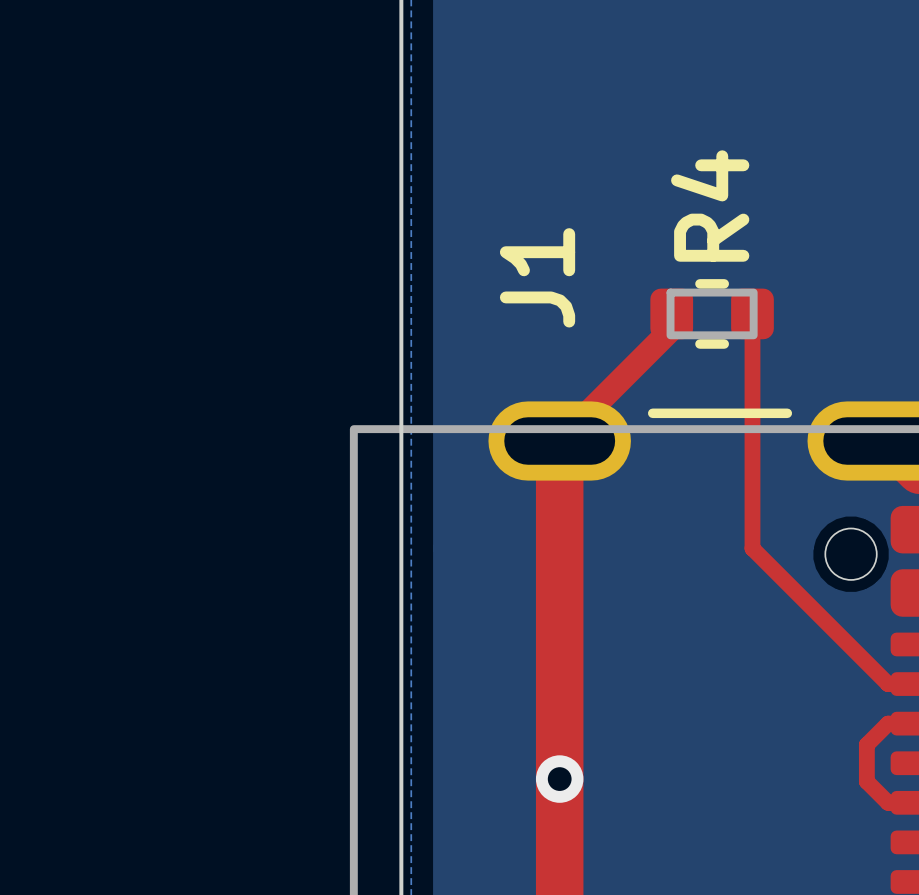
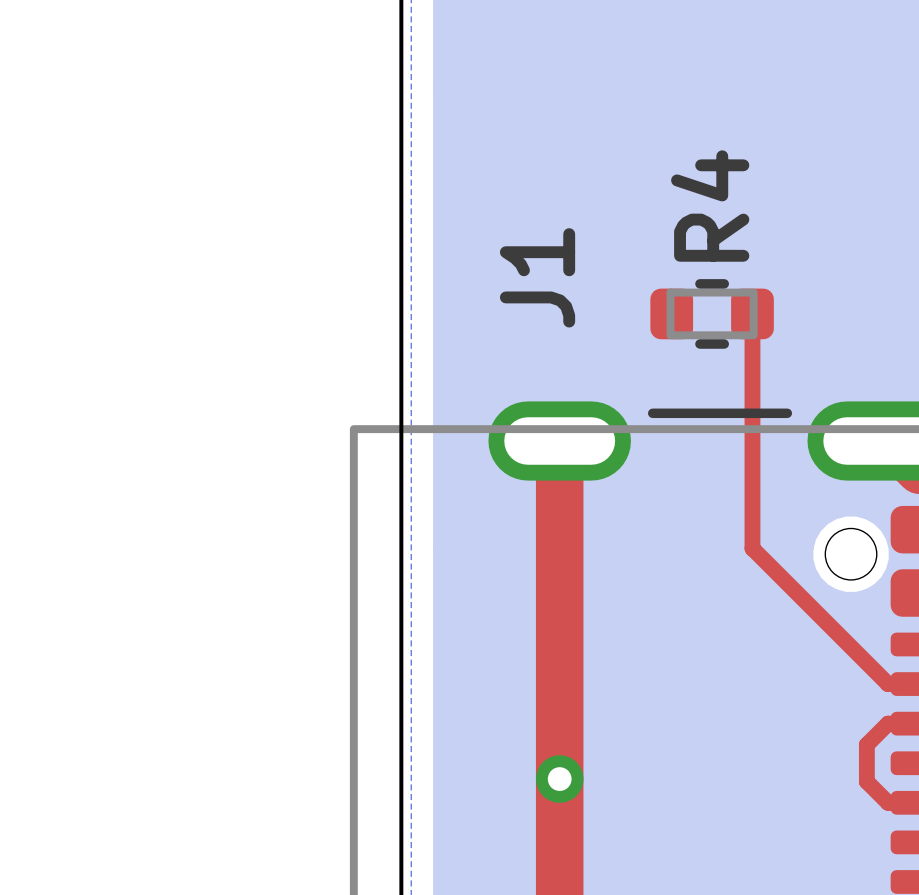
top track: (671, 313) (671, 328) (559, 441) -> none

